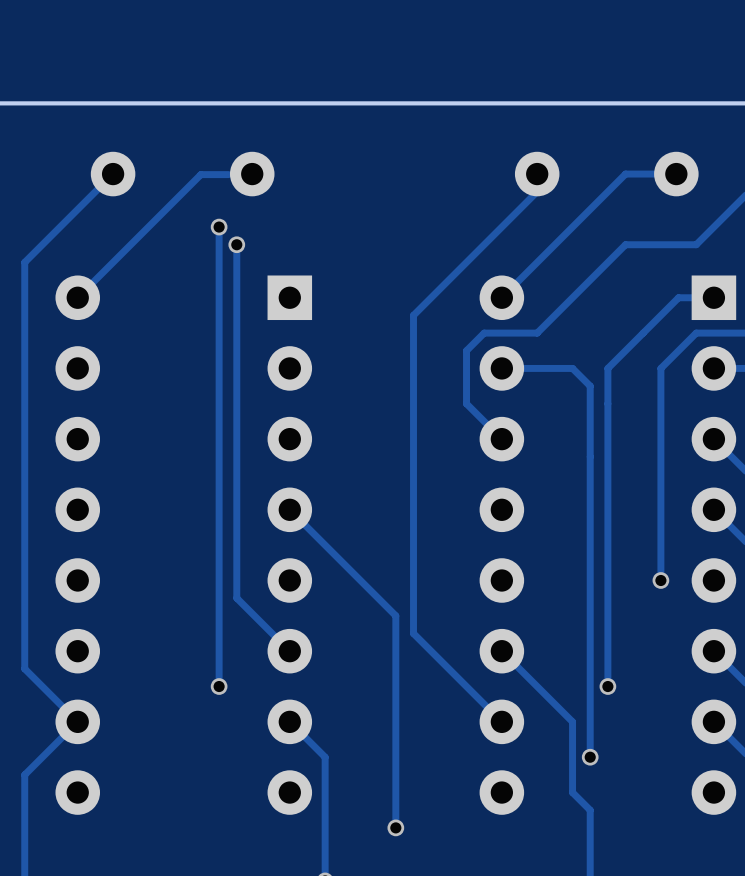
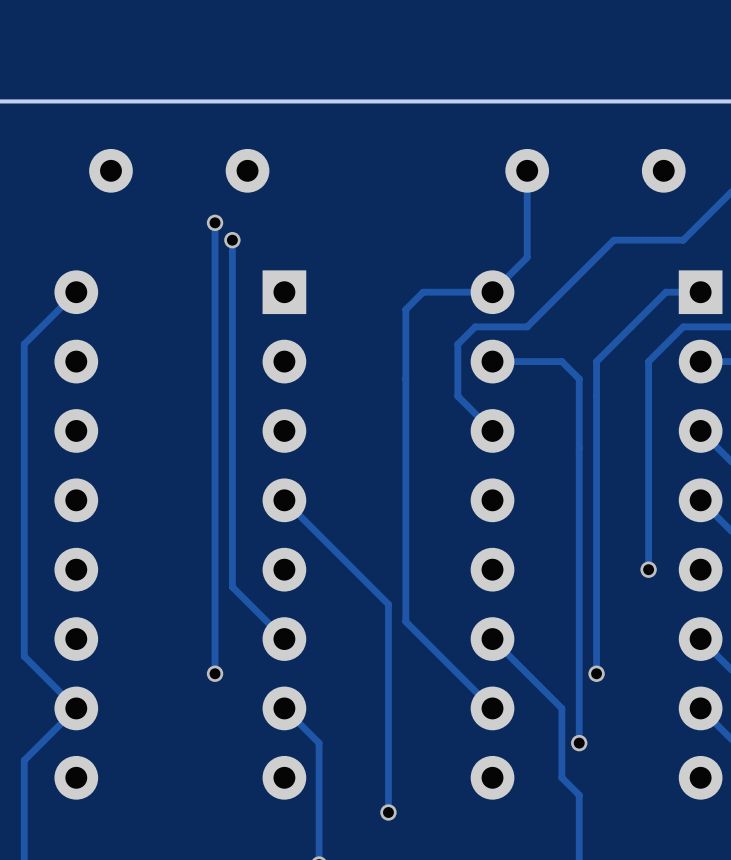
track: (113, 174) (24, 262) (24, 350) -> (76, 292) (24, 344)
track: (228, 174) (200, 174) (77, 297) -> none
track: (676, 174) (625, 174) (537, 262) -> none
track: (537, 191) (431, 297) -> (527, 188) (527, 257)
track: none -> (492, 292) (423, 292)

